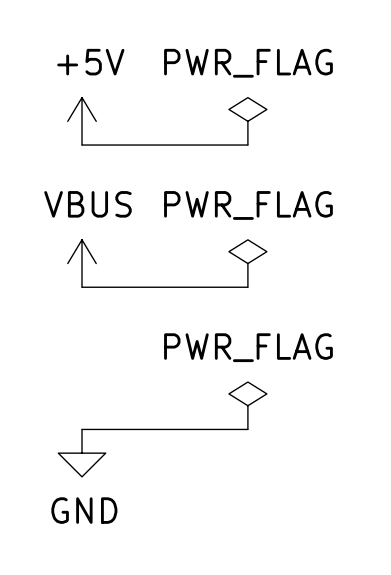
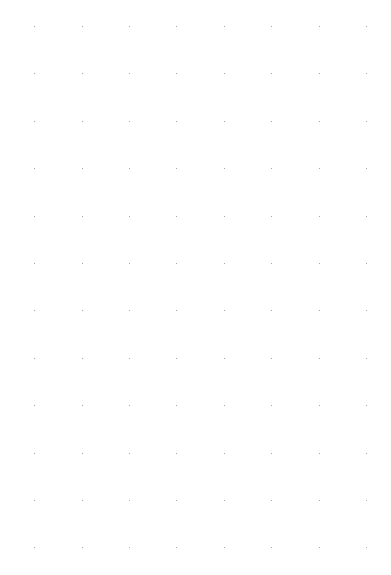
power symbol: +5V (82, 121) -> none
power symbol: PWR_FLAG (247, 121) -> none
wire: (82, 145) (247, 145) -> none
power symbol: VBUS (82, 263) -> none
power symbol: PWR_FLAG (247, 263) -> none
wire: (82, 287) (247, 287) -> none
power symbol: PWR_FLAG (247, 405) -> none
wire: (82, 429) (247, 429) -> none
power symbol: GND (82, 453) -> none

